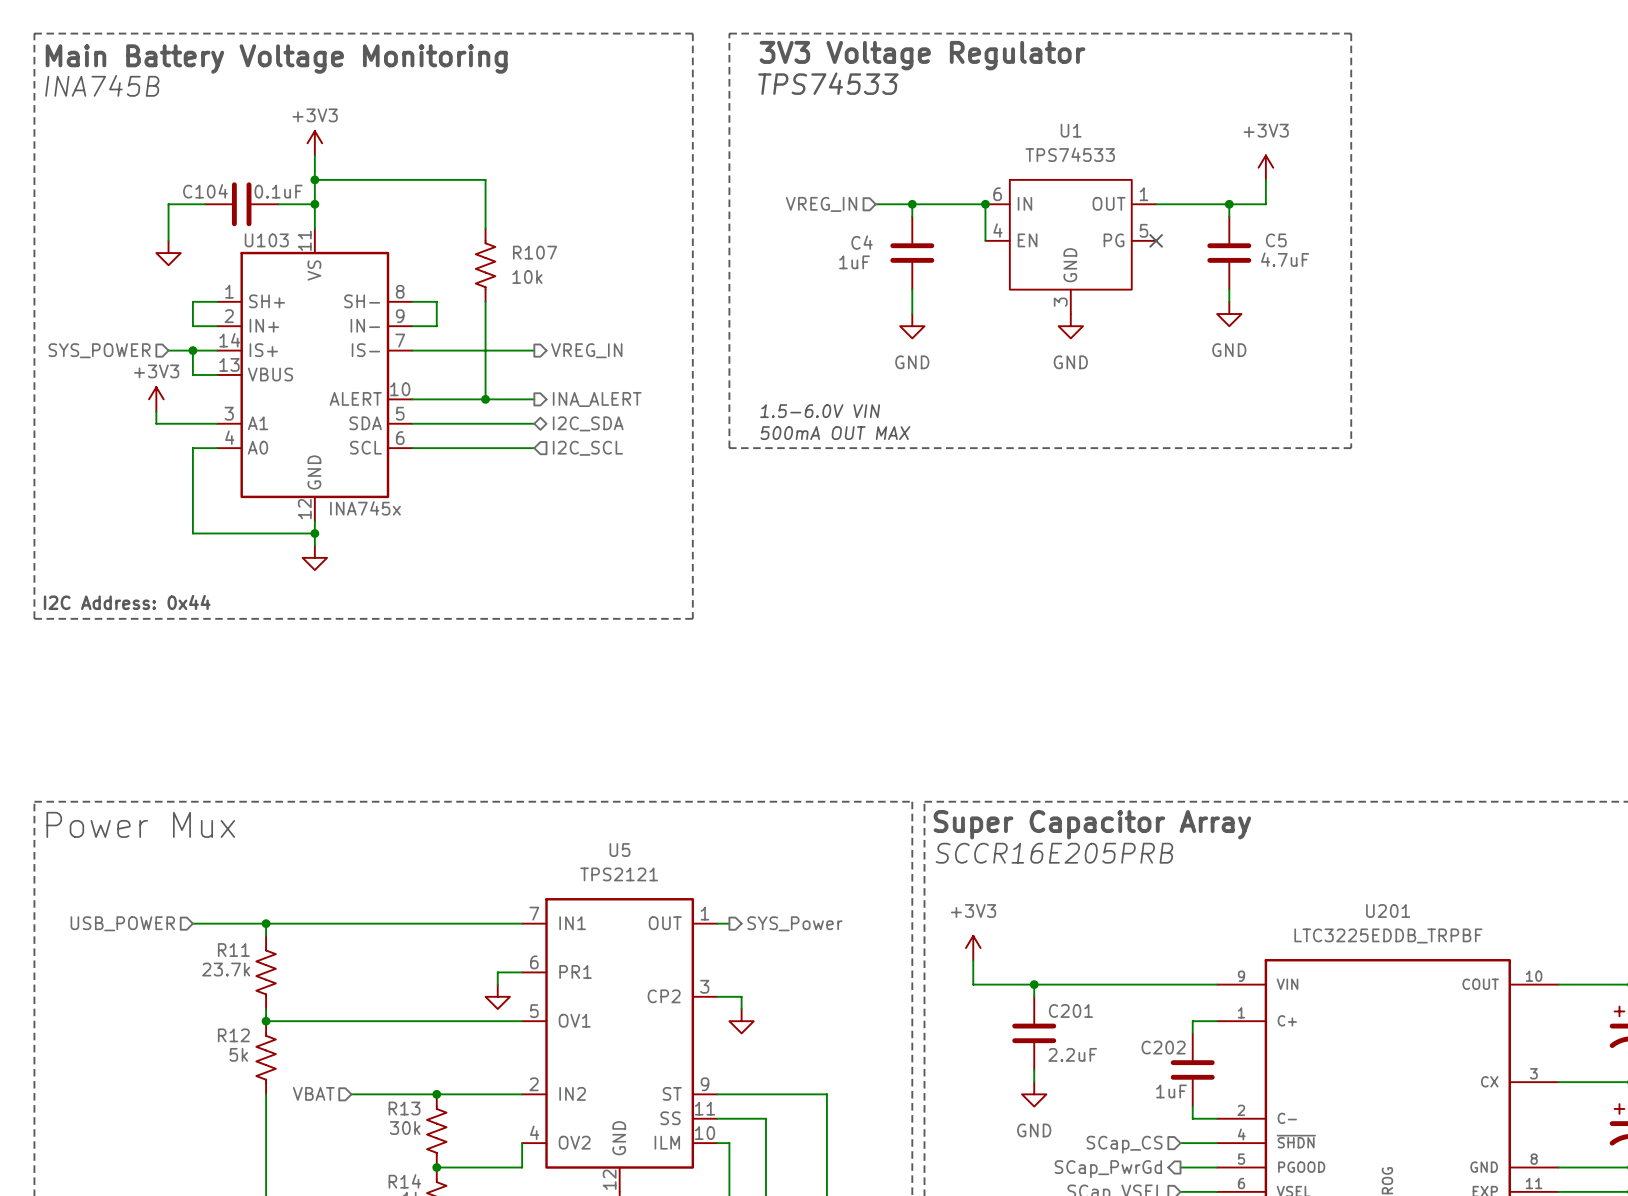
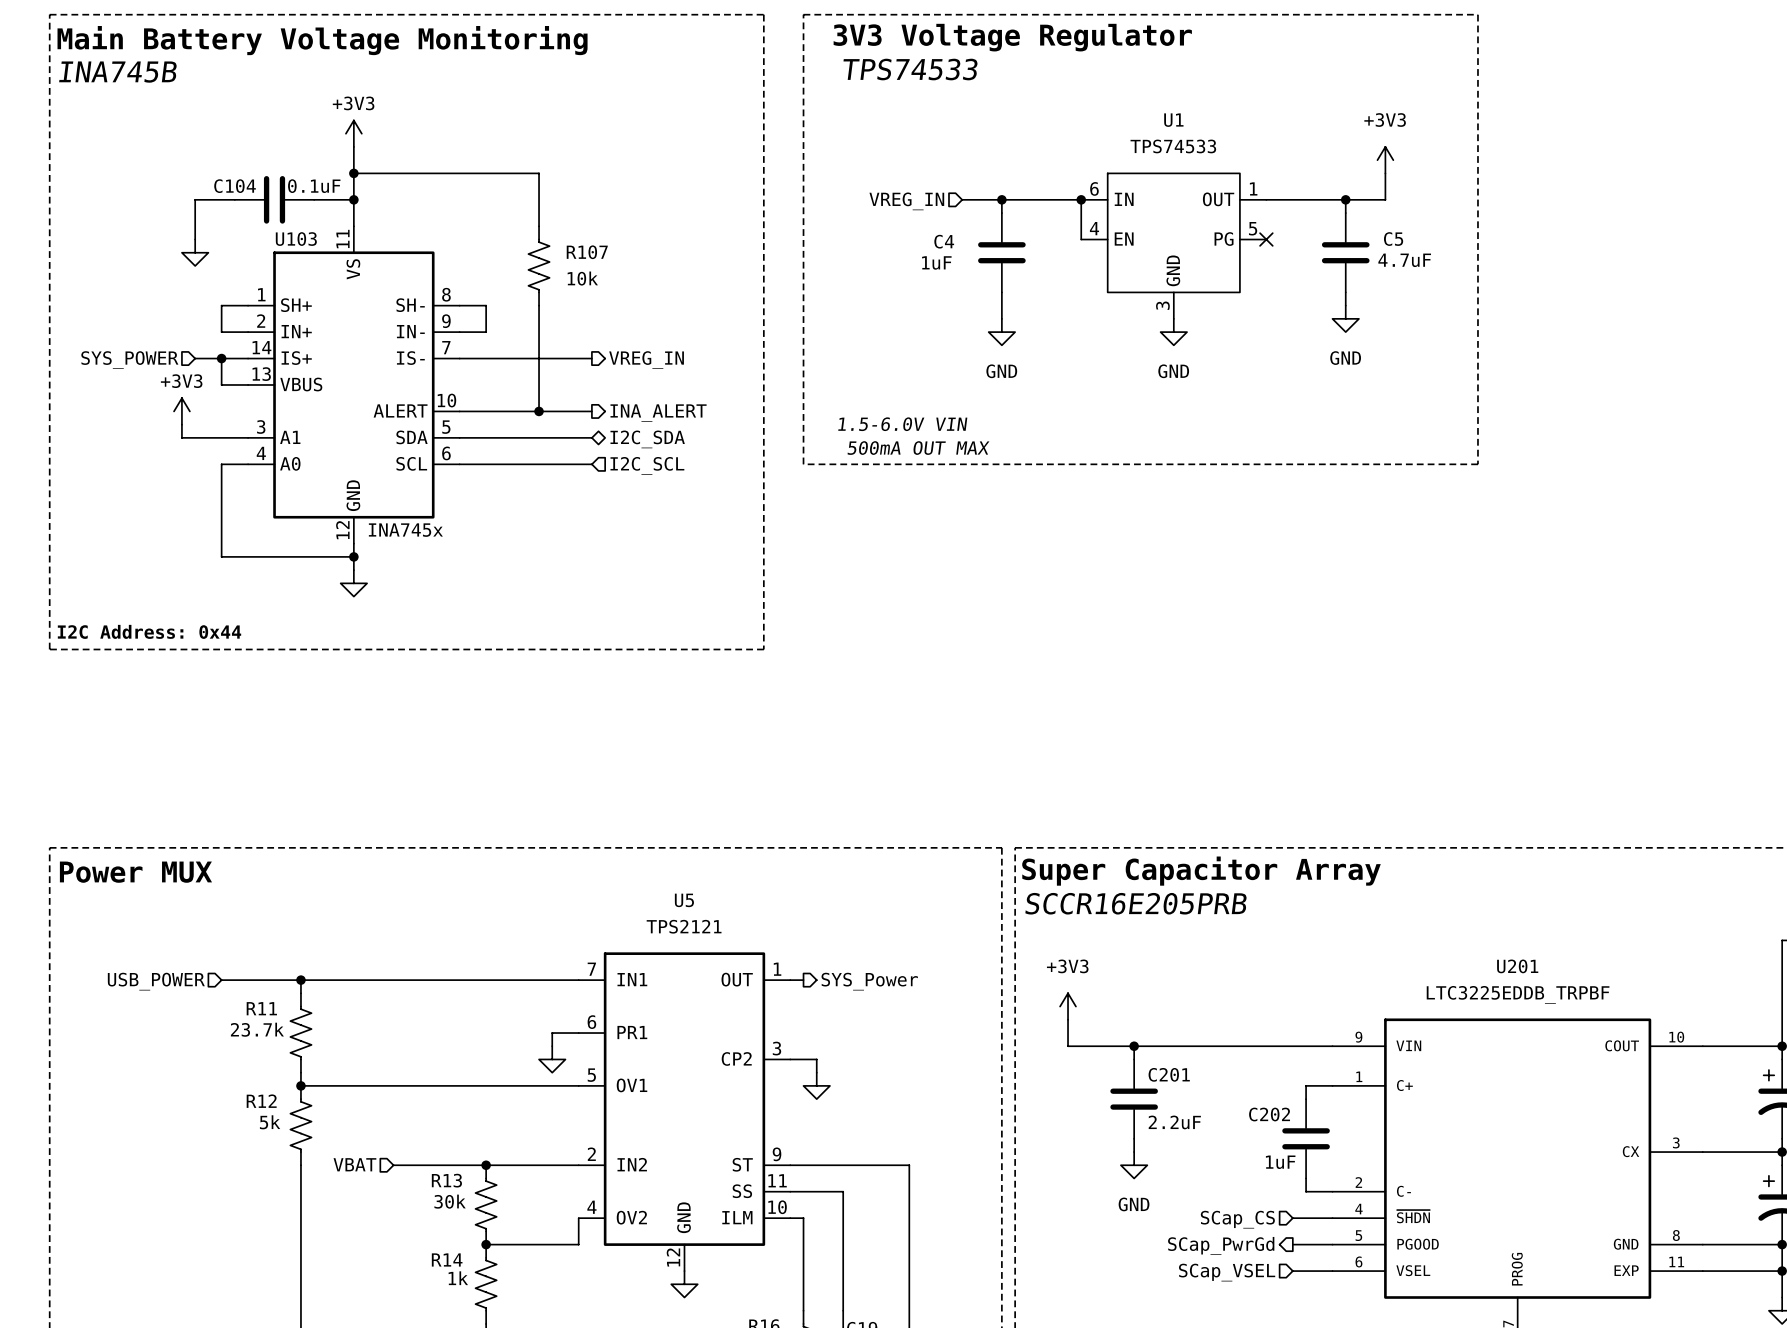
text: Power Mux (140, 824) -> Power MUX (135, 872)

